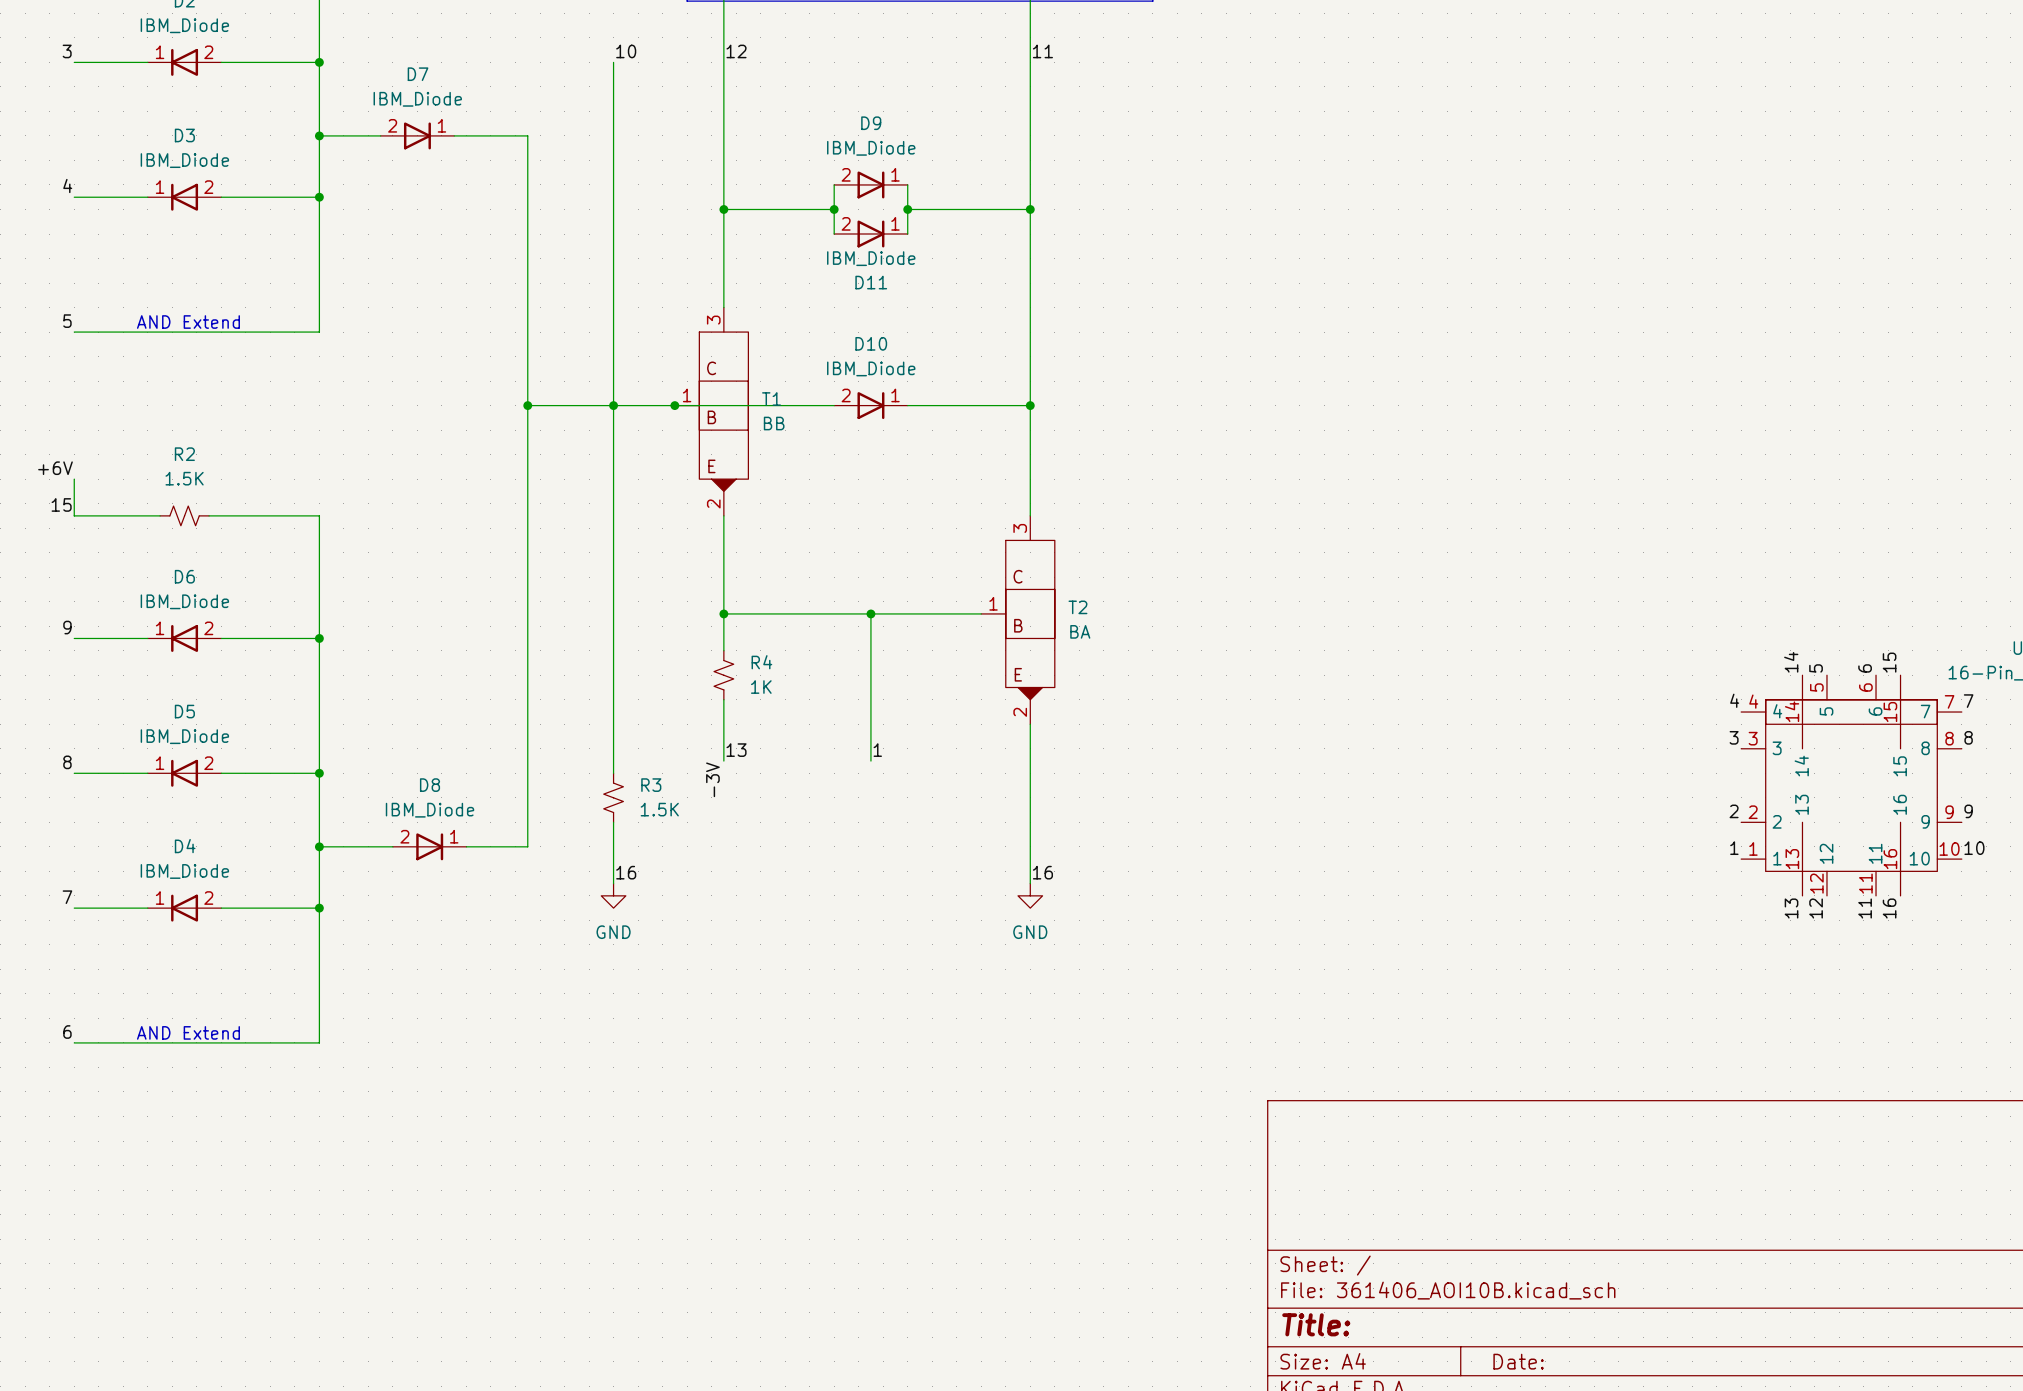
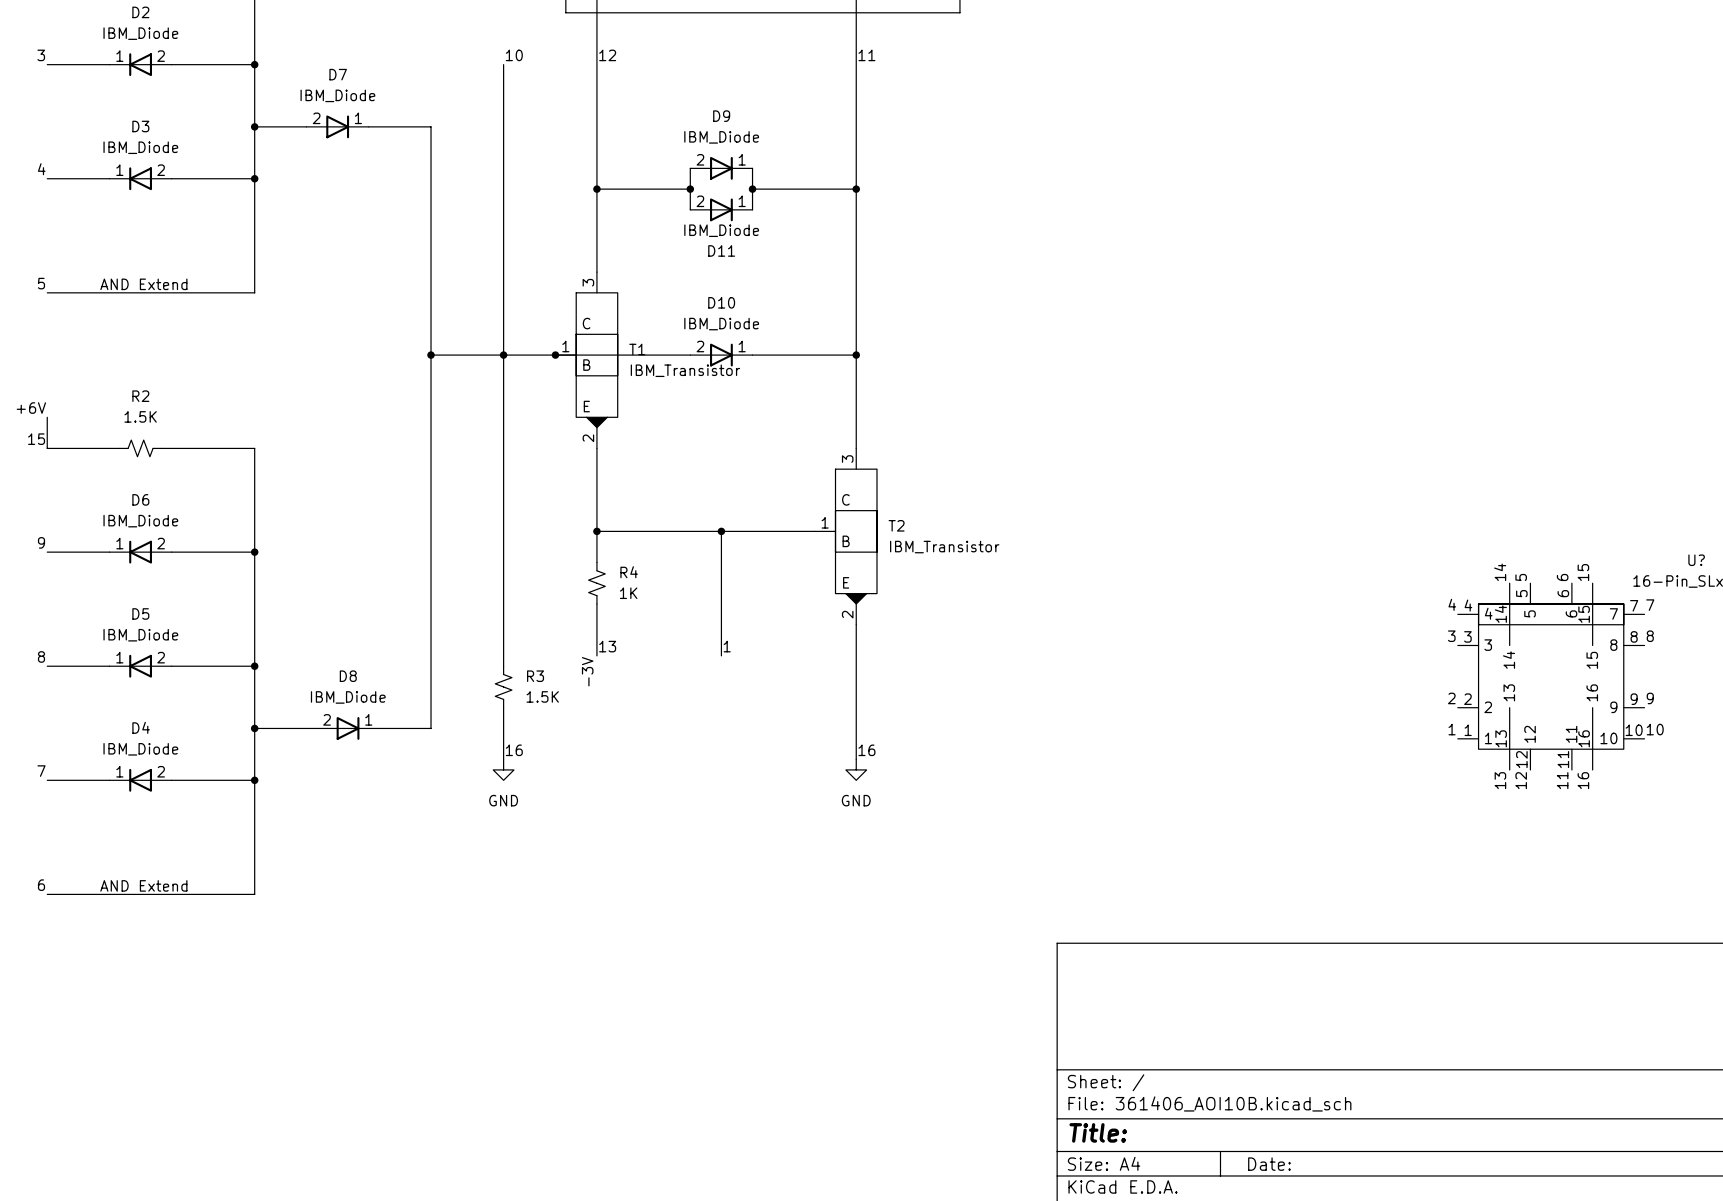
T1 value: BB (774, 423) -> IBM_Transistor (685, 370)
T2 value: BA (1080, 631) -> IBM_Transistor (944, 547)

